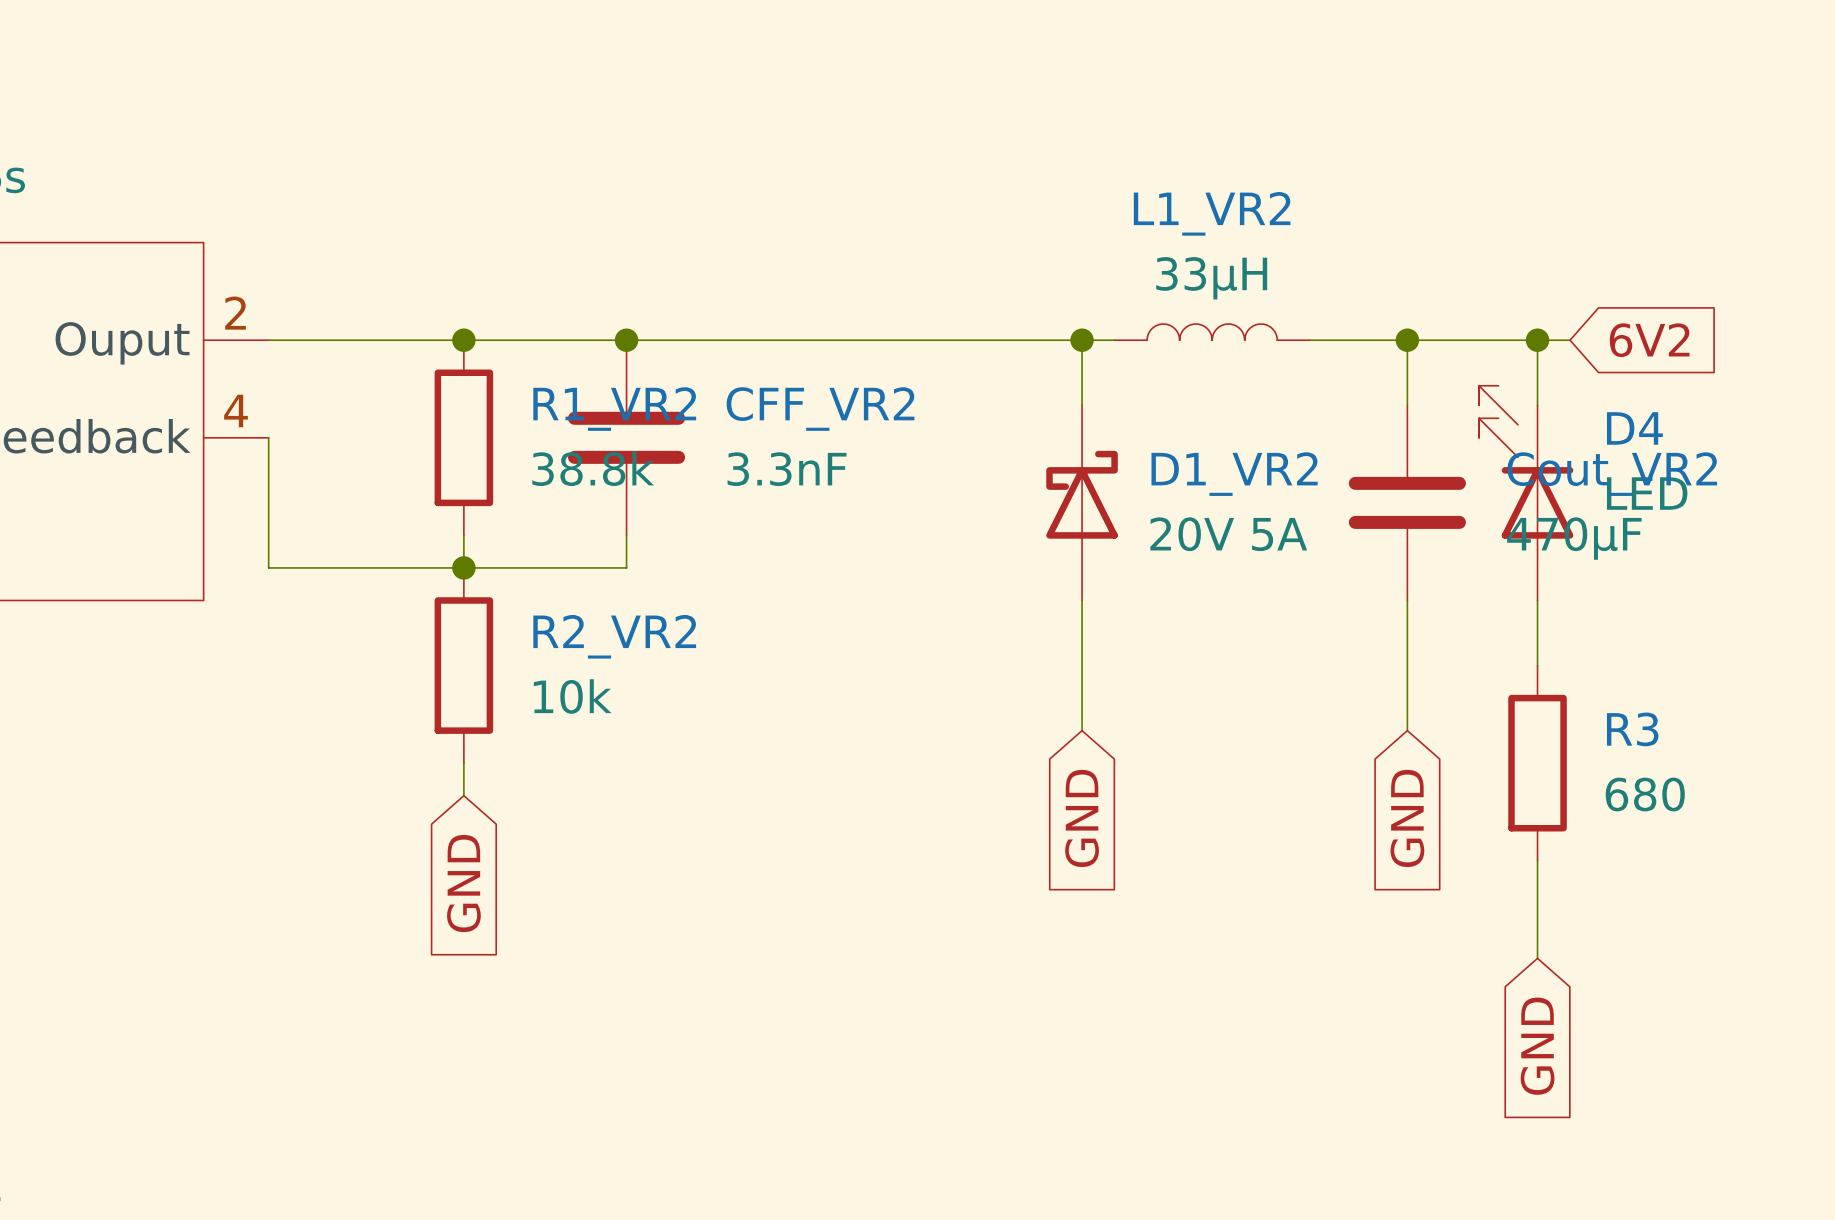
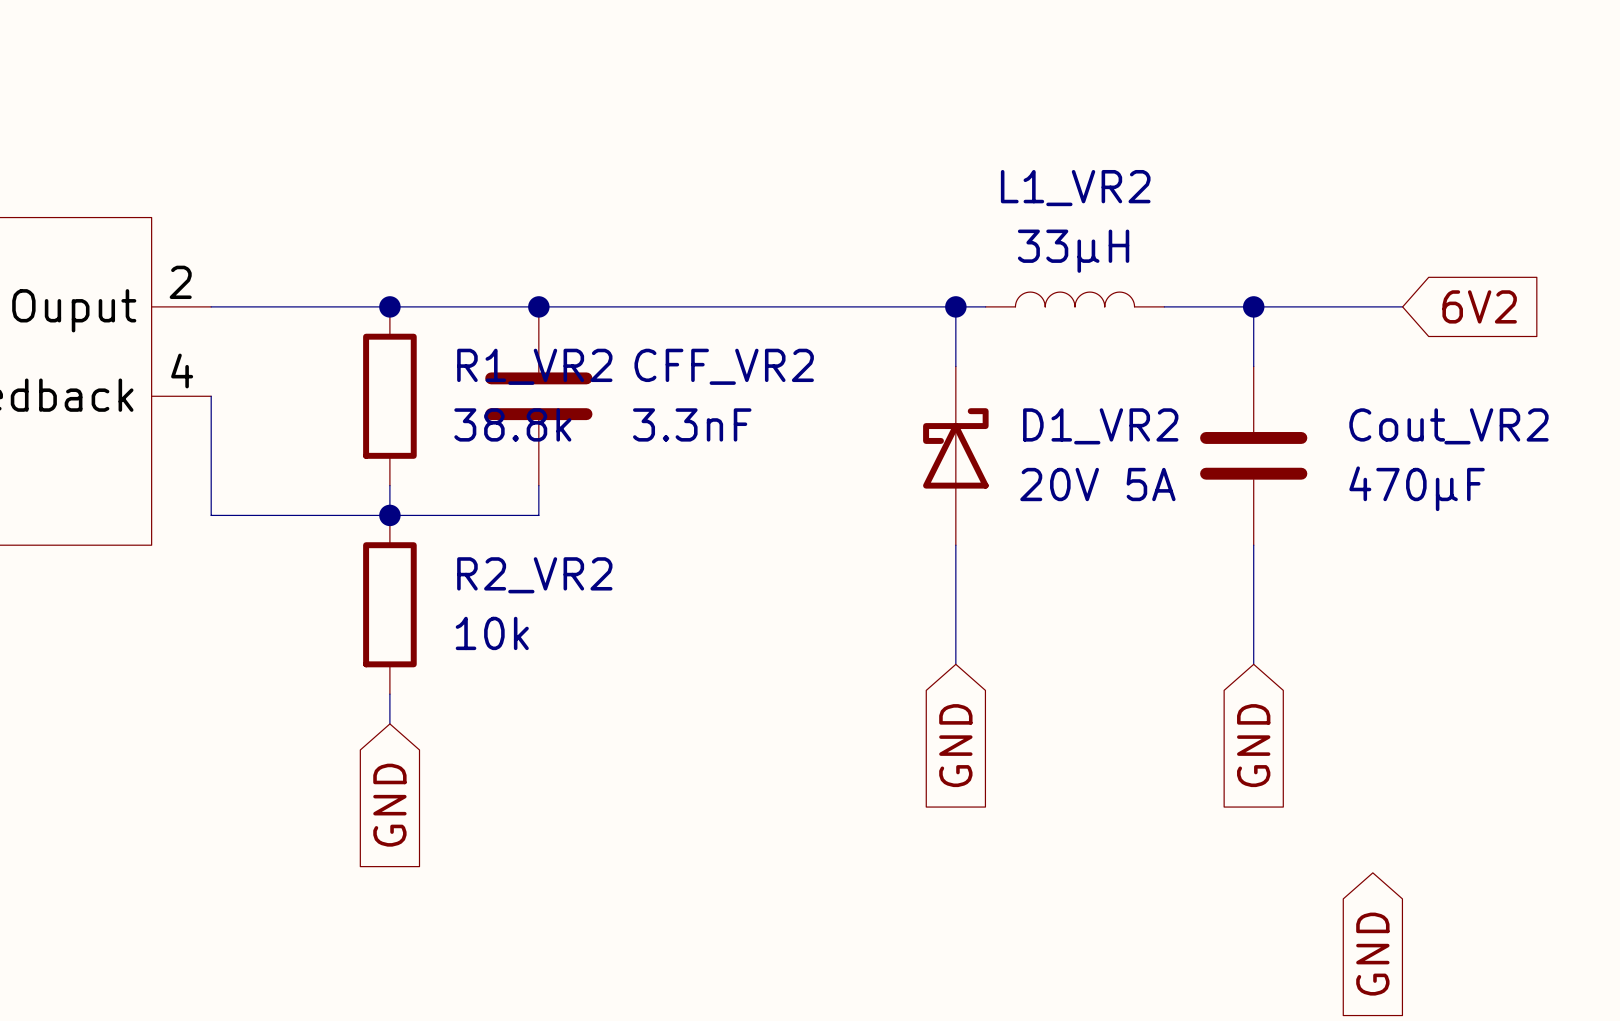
wire: (1537, 340) (1537, 405) -> none
junction: (1537, 340) -> none
D4: LED (1526, 493) -> none
wire: (1537, 600) (1537, 665) -> none
R3: 680 (1537, 763) -> none
wire: (1537, 860) (1537, 958) -> none

